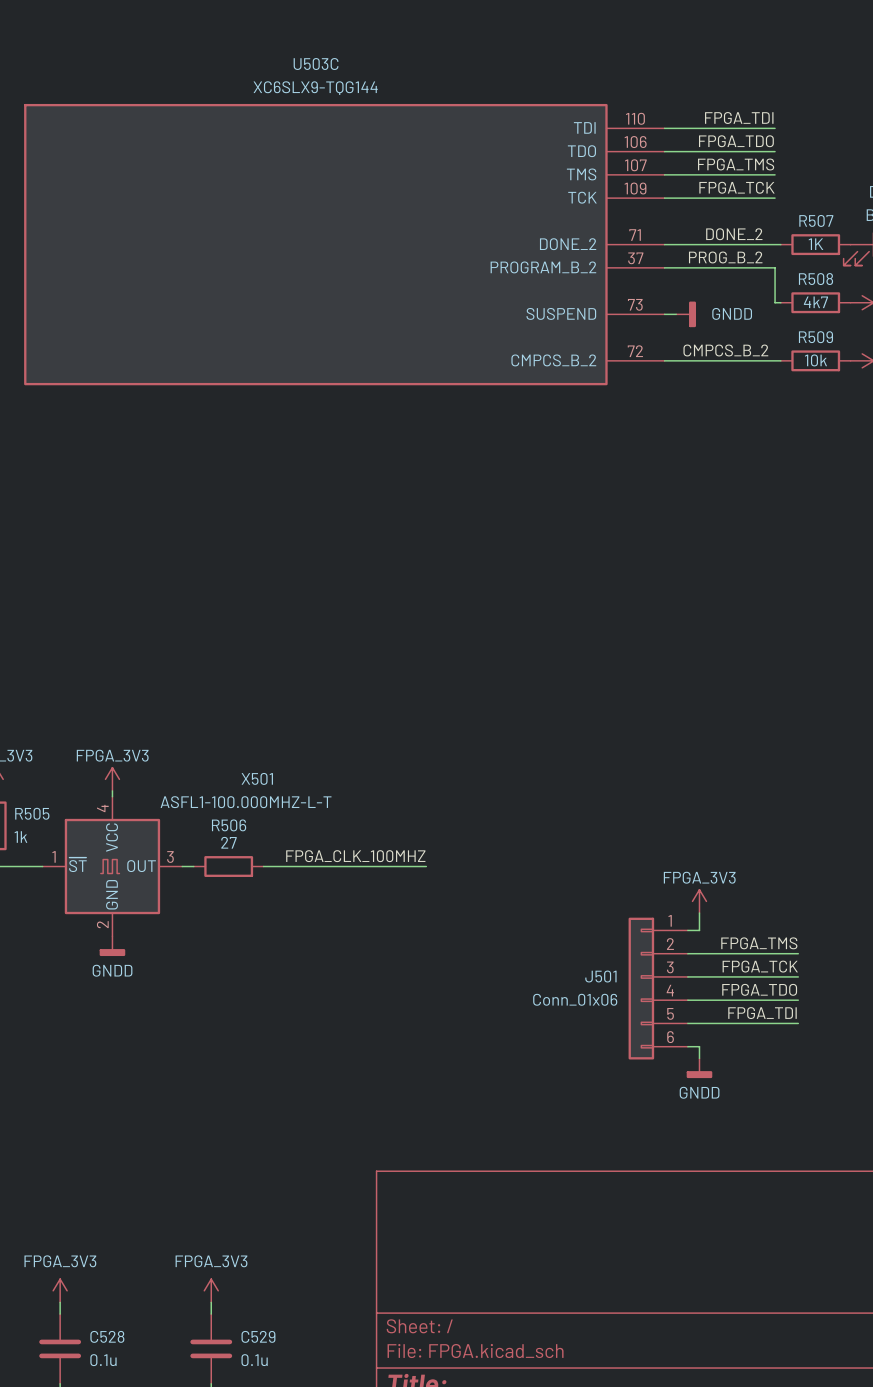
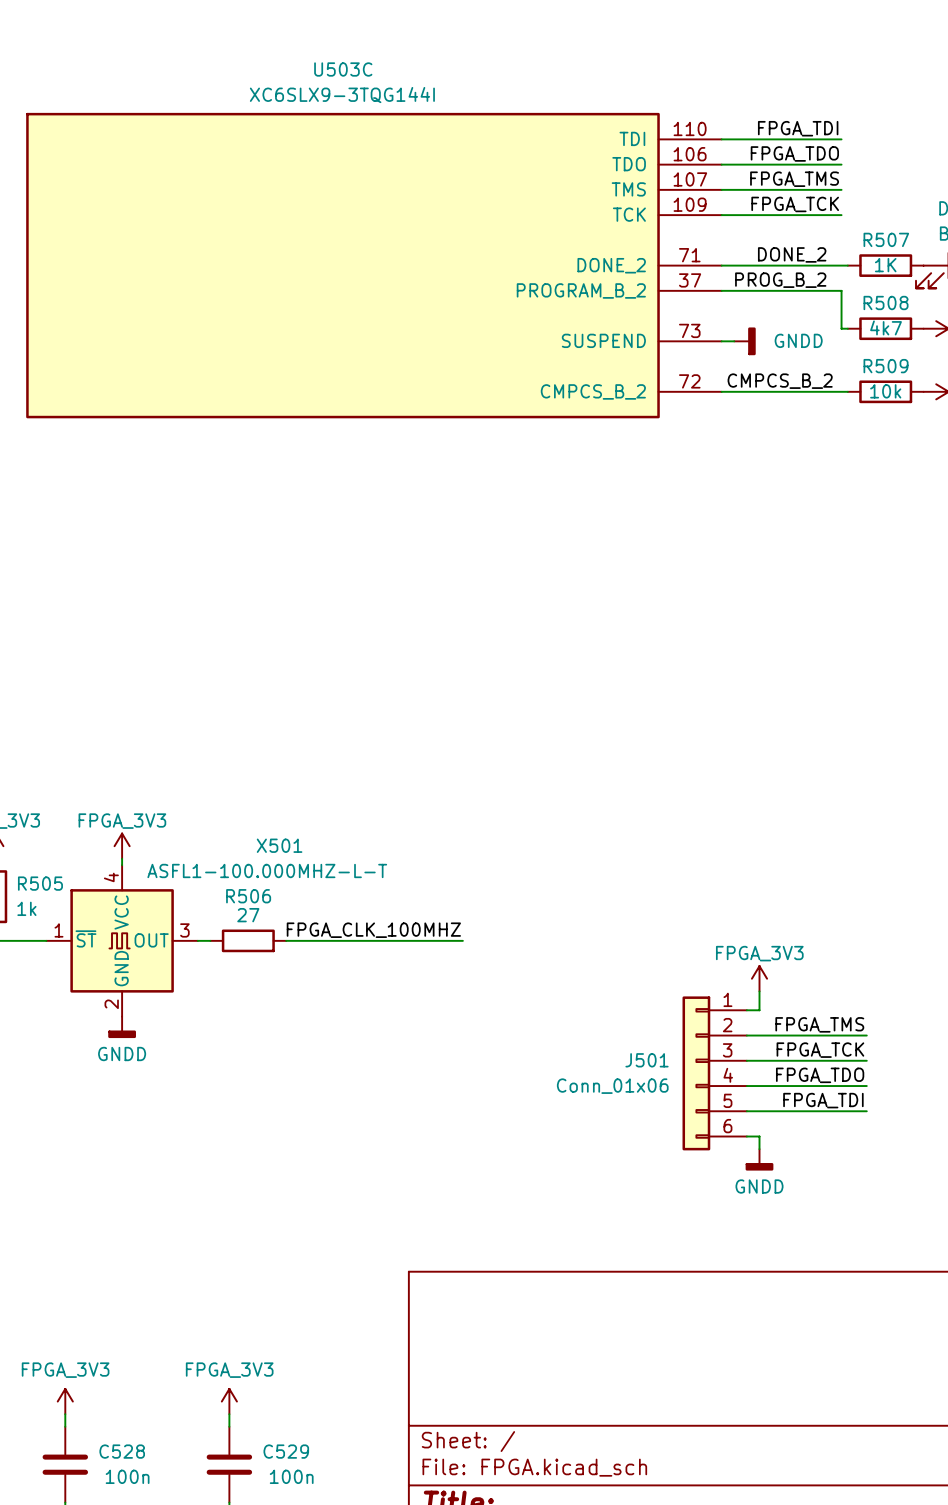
U503C value: XC6SLX9-TQG144 (315, 88) -> XC6SLX9-3TQG144I (342, 95)
C528 value: 0.1u (103, 1360) -> 100n (127, 1476)
C529 value: 0.1u (254, 1360) -> 100n (291, 1476)

